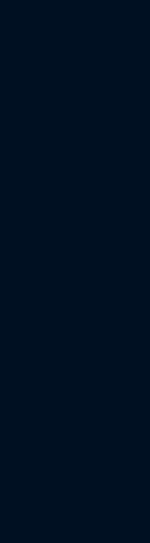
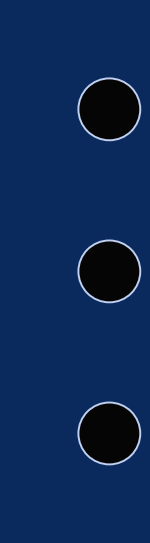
part: none -> (109, 109)
part: none -> (109, 271)
part: none -> (109, 433)

